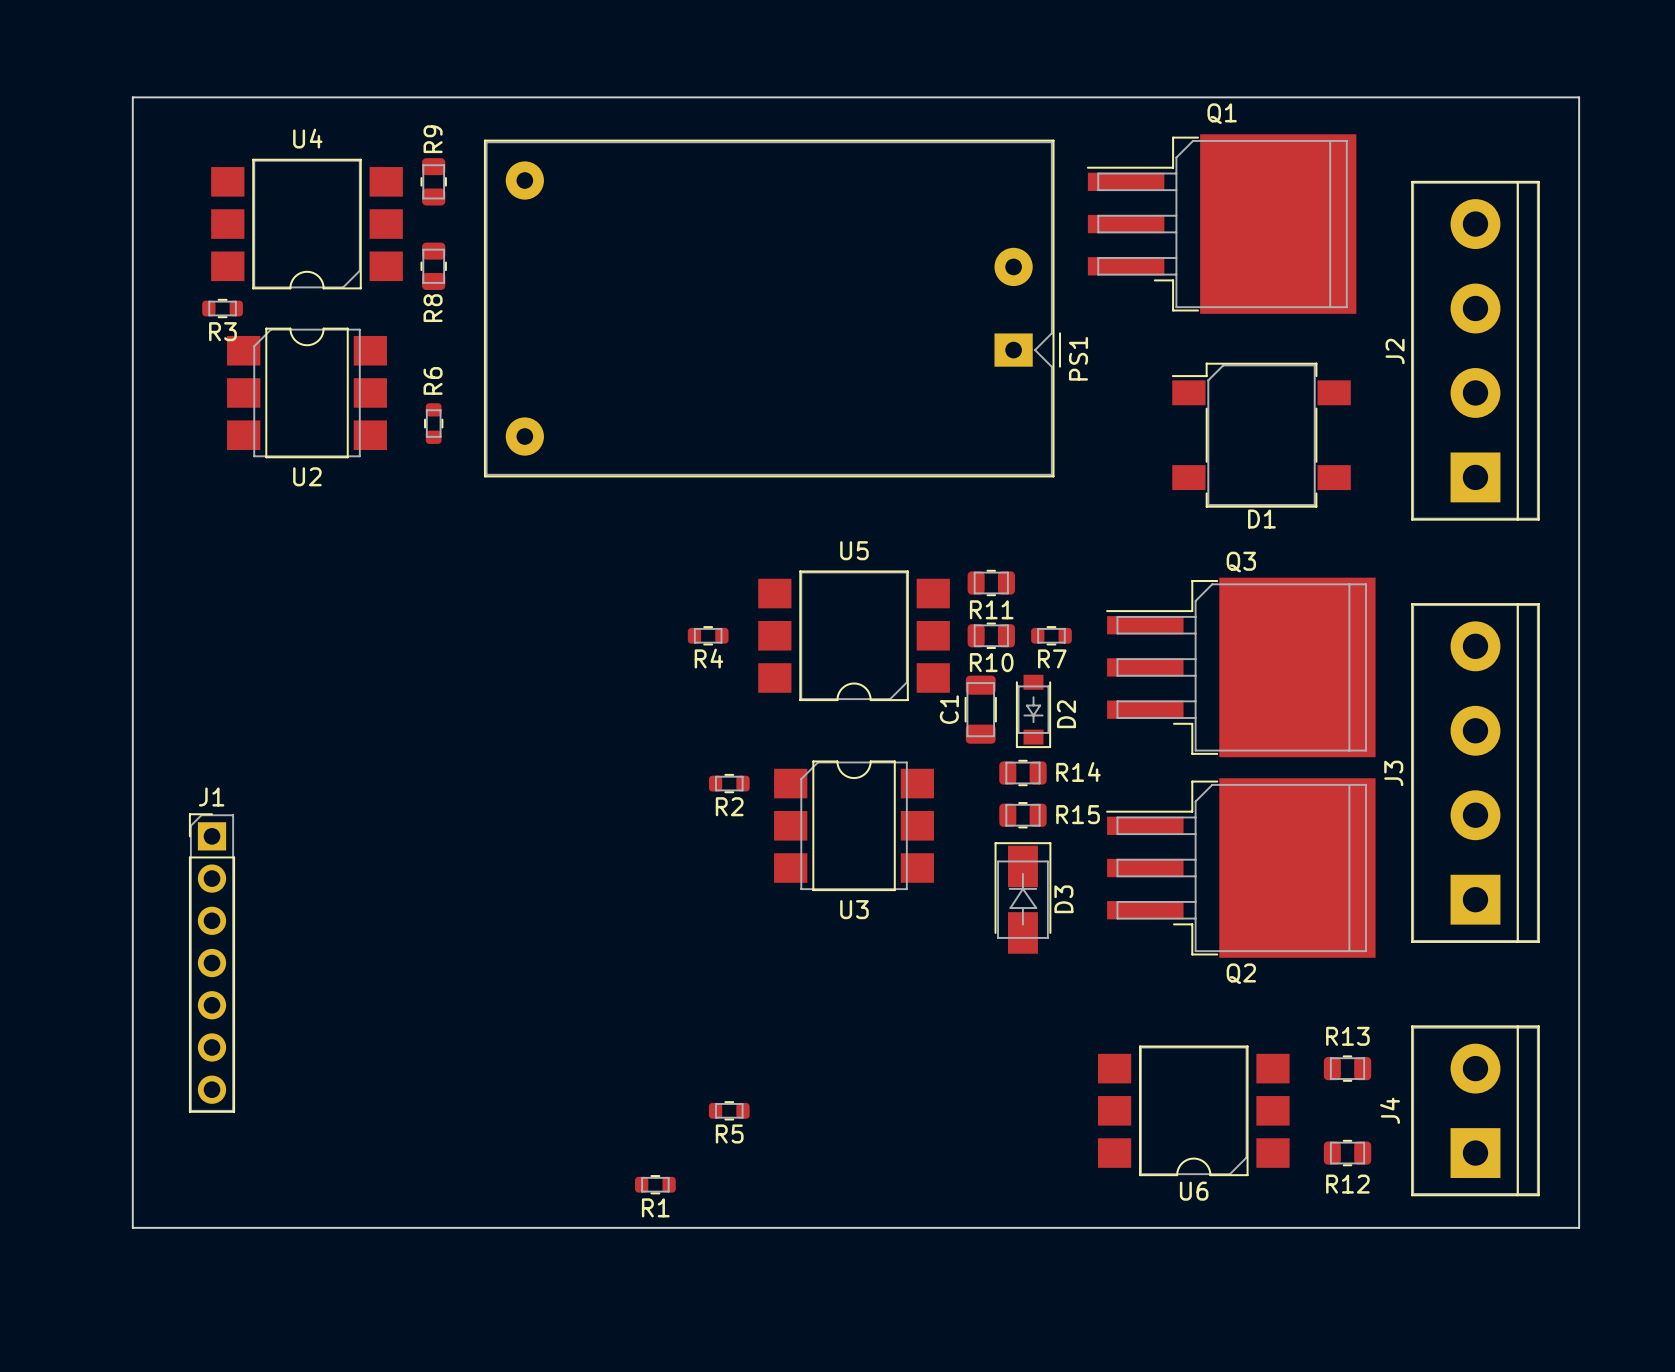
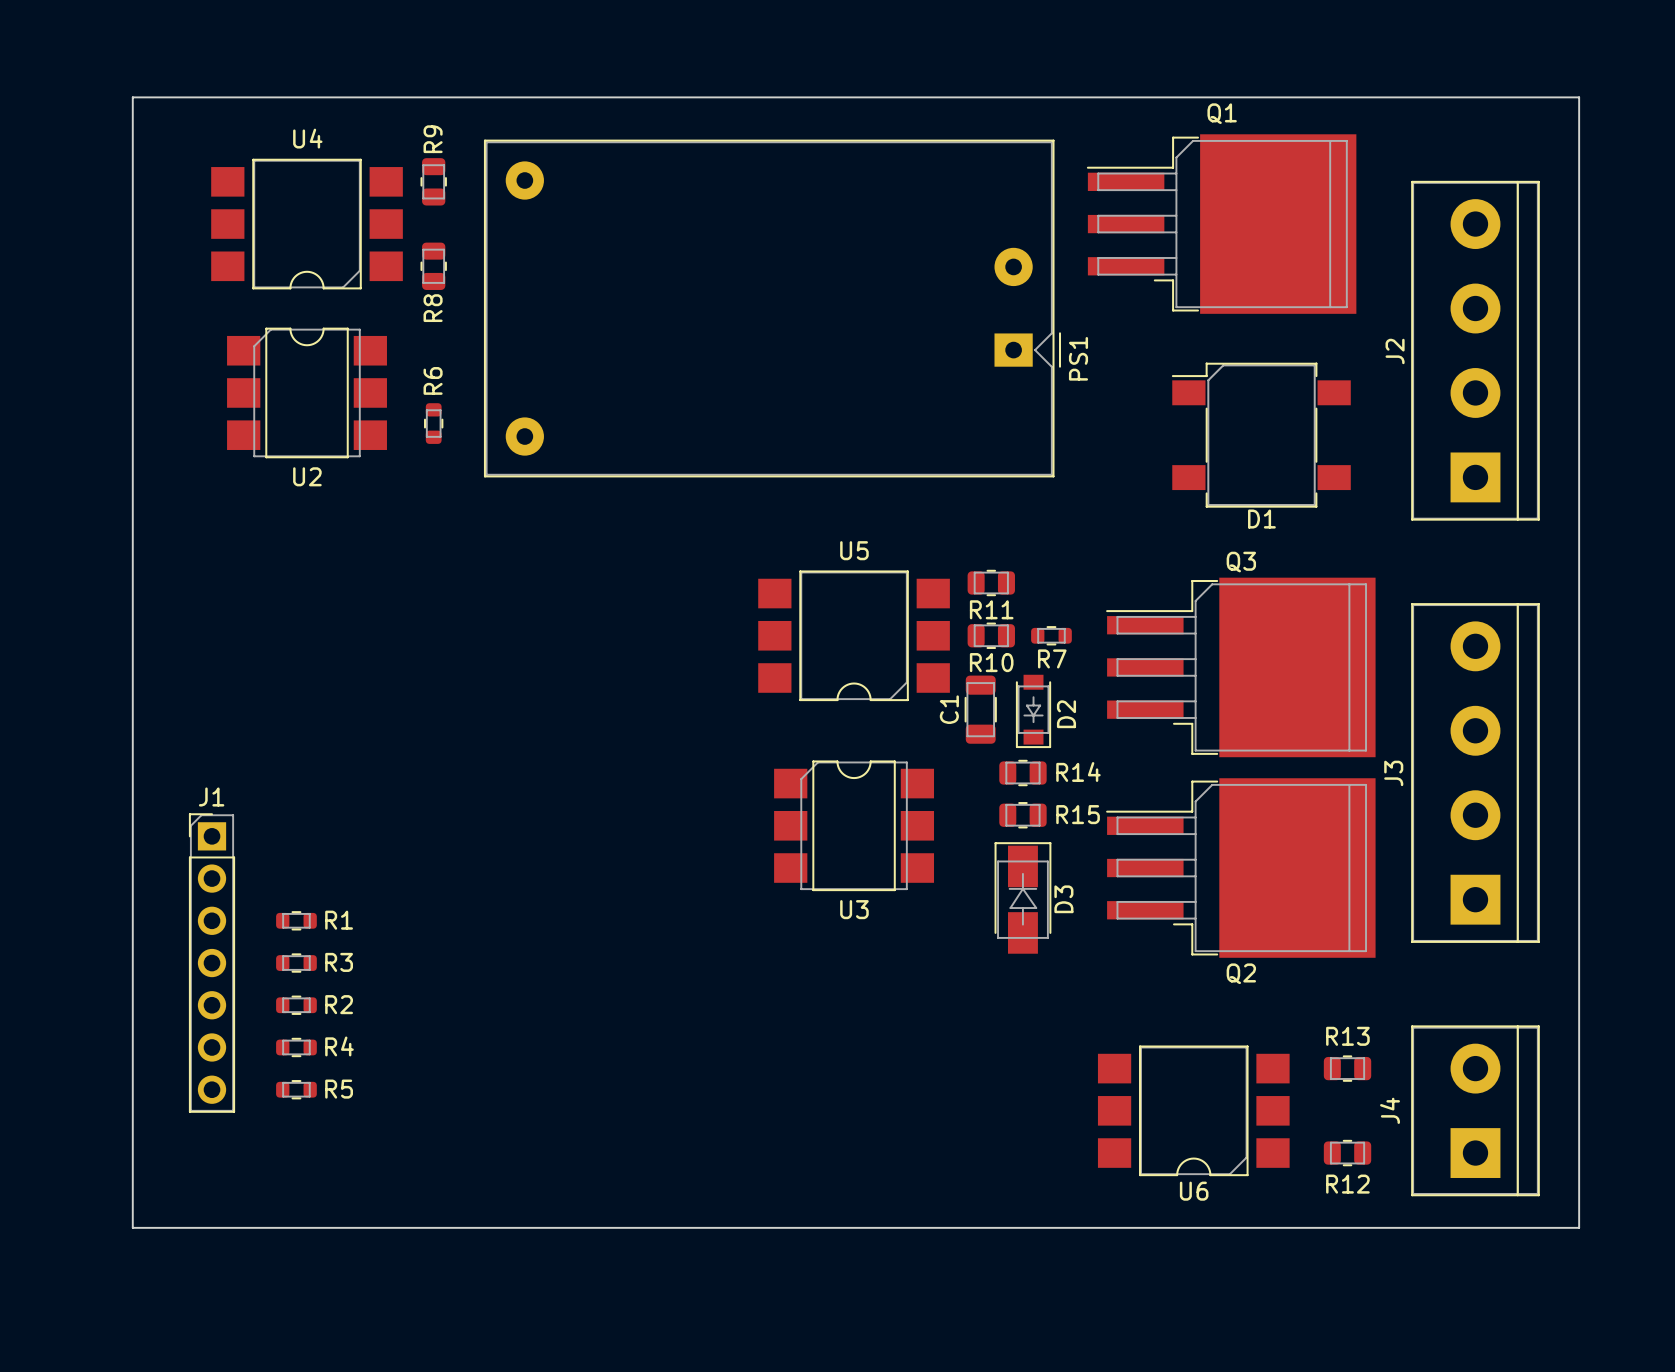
R3 position: (222, 308) -> (296, 963)
R3 name position: R3 (222, 331) -> R3 (339, 962)
R4 position: (708, 635) -> (296, 1047)
R4 name position: R4 (708, 658) -> R4 (339, 1046)
R2 position: (729, 783) -> (296, 1005)
R2 name position: R2 (729, 806) -> R2 (339, 1004)
R5 position: (729, 1110) -> (296, 1089)
R5 name position: R5 (729, 1133) -> R5 (339, 1089)
R1 position: (655, 1184) -> (296, 920)
R1 name position: R1 (655, 1207) -> R1 (339, 920)

